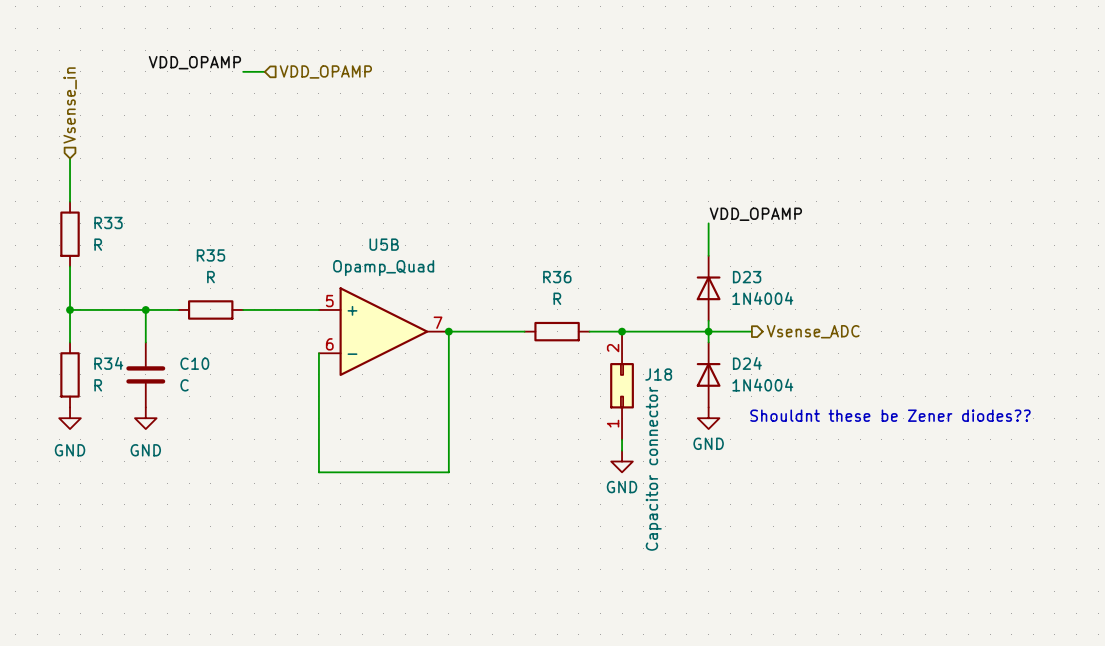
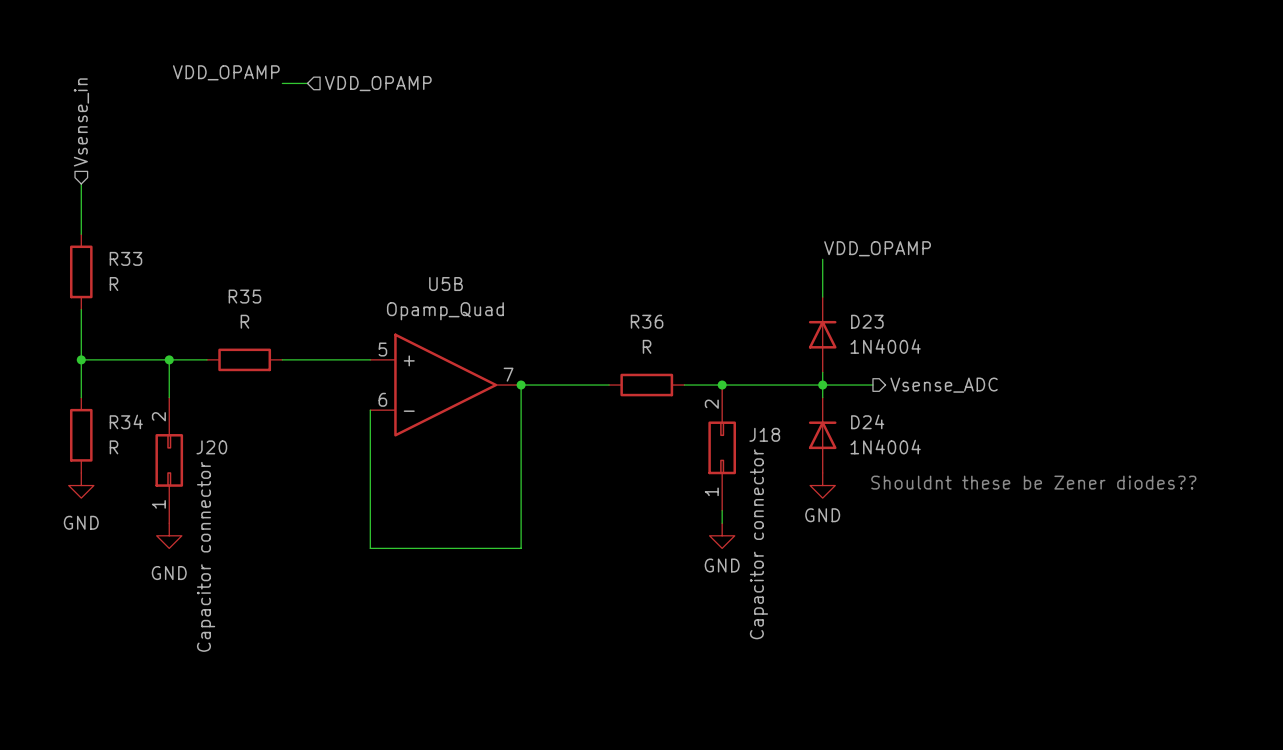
C10: C (145, 374) -> none
J20: none -> Capacitor connector (169, 460)
power symbol position: GND (145, 418) -> GND (169, 535)

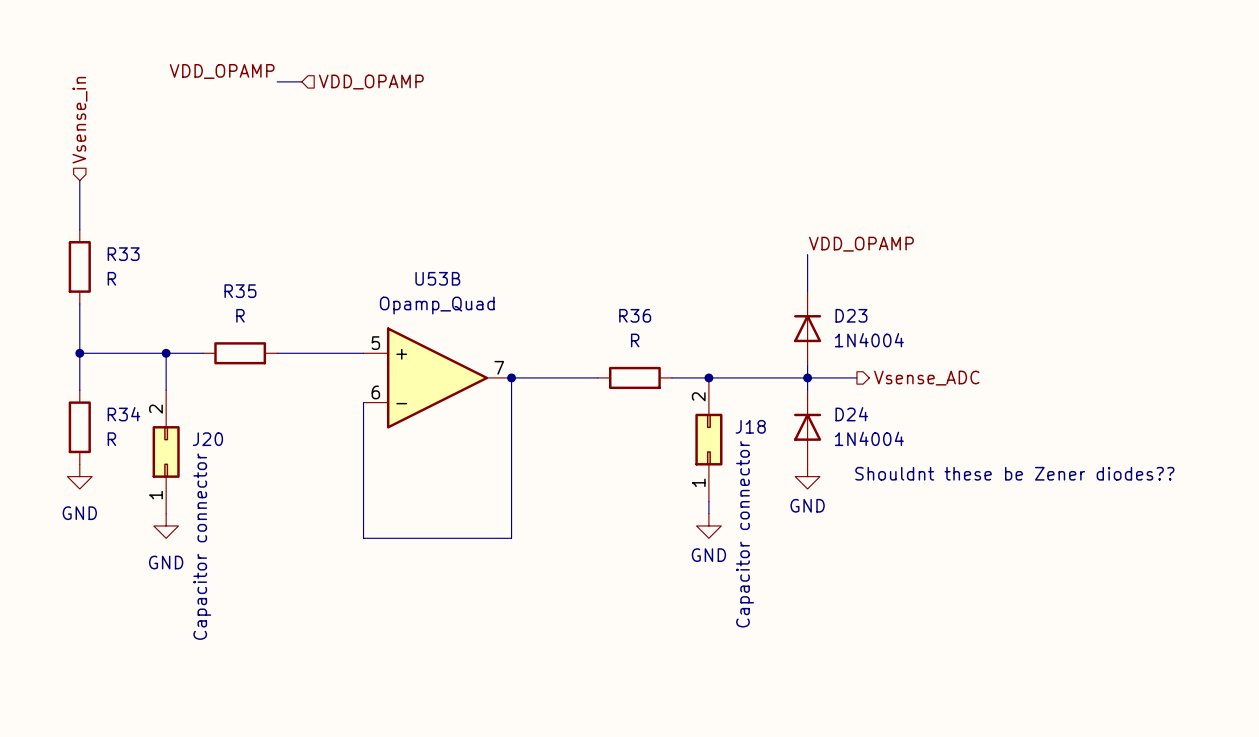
U5B name: U5B (446, 284) -> U53B (437, 278)

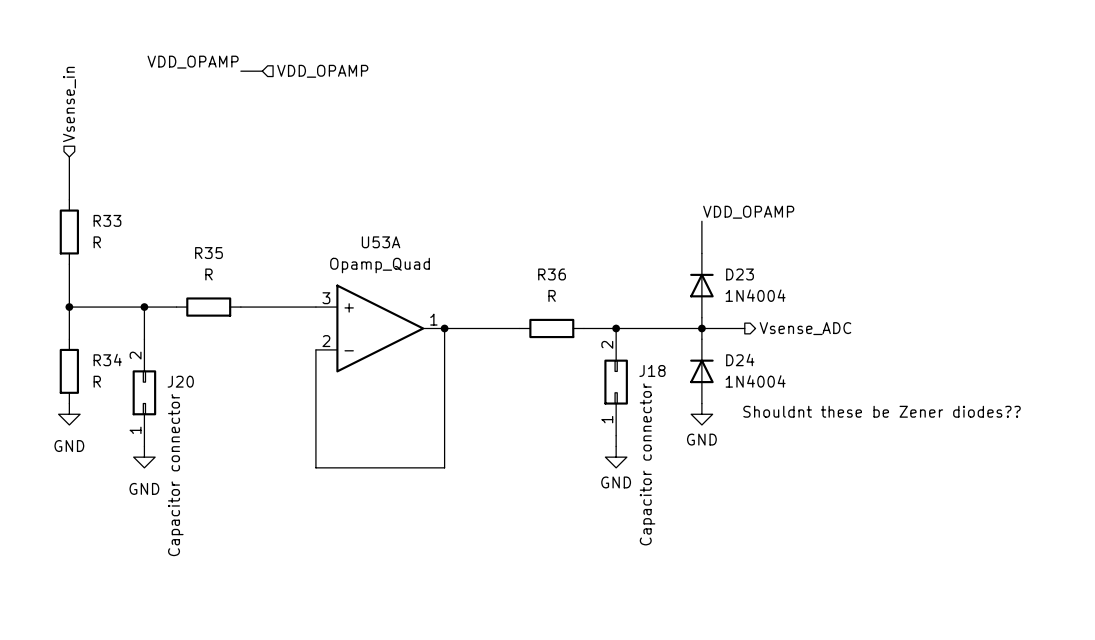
U53B name: U53B (437, 278) -> U53A (381, 242)
U53B pin number: 5 (375, 343) -> 3 (326, 298)
U53B pin number: 7 (499, 367) -> 1 (433, 319)
U53B pin number: 6 (375, 392) -> 2 (326, 341)

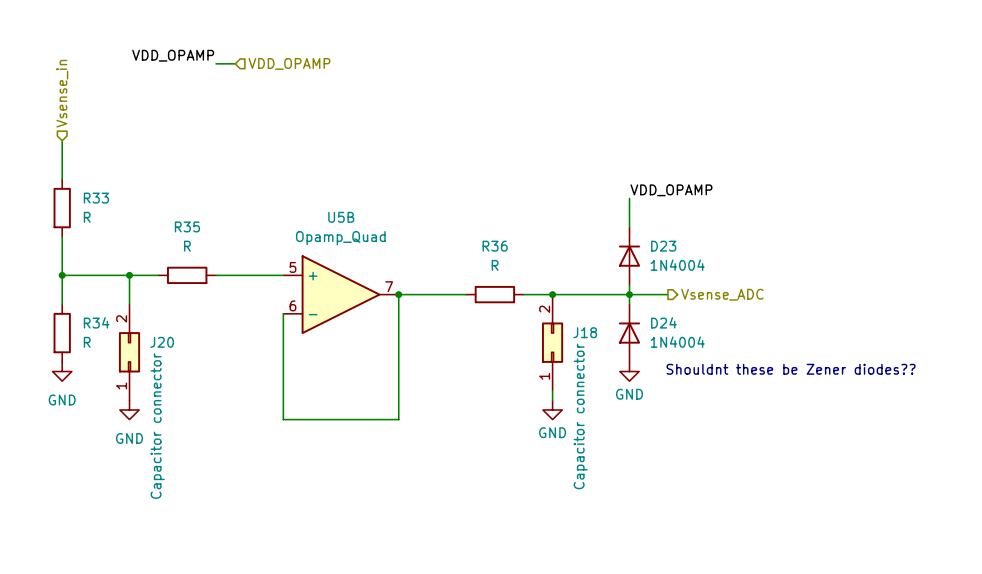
U53A name: U53A (381, 242) -> U5B (341, 217)
U53A pin number: 3 (326, 298) -> 5 (292, 267)
U53A pin number: 1 (433, 319) -> 7 (389, 286)
U53A pin number: 2 (326, 341) -> 6 (292, 305)

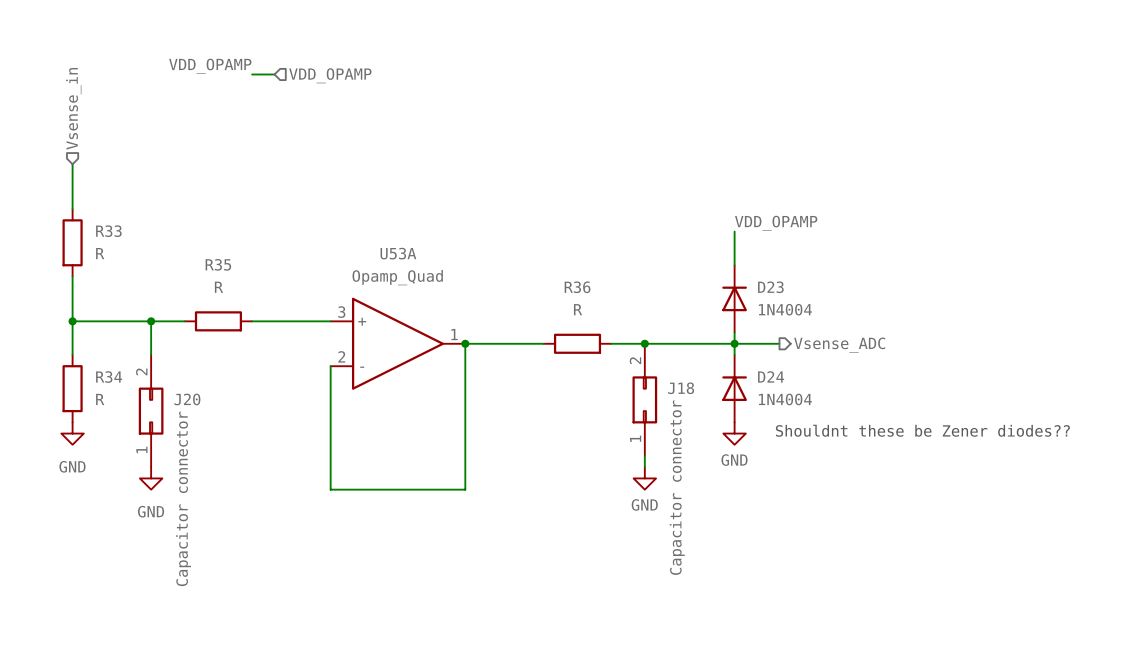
U5B name: U5B (341, 217) -> U53A (398, 253)
U5B pin number: 5 (292, 267) -> 3 (341, 312)
U5B pin number: 7 (389, 286) -> 1 (454, 334)
U5B pin number: 6 (292, 305) -> 2 (341, 356)

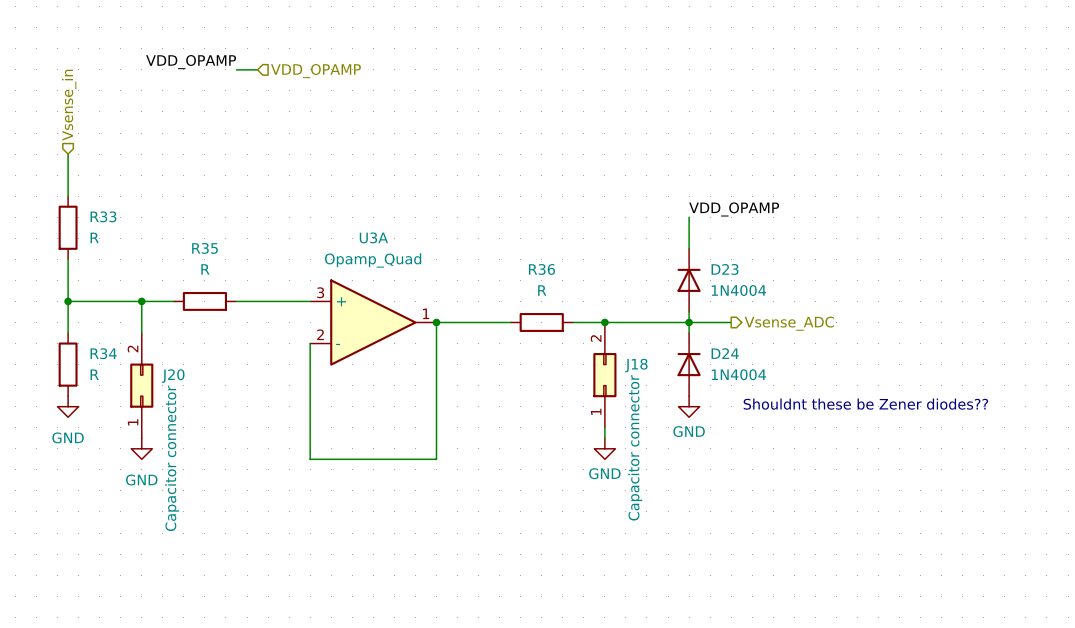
U53A name: U53A (398, 253) -> U3A (373, 237)

